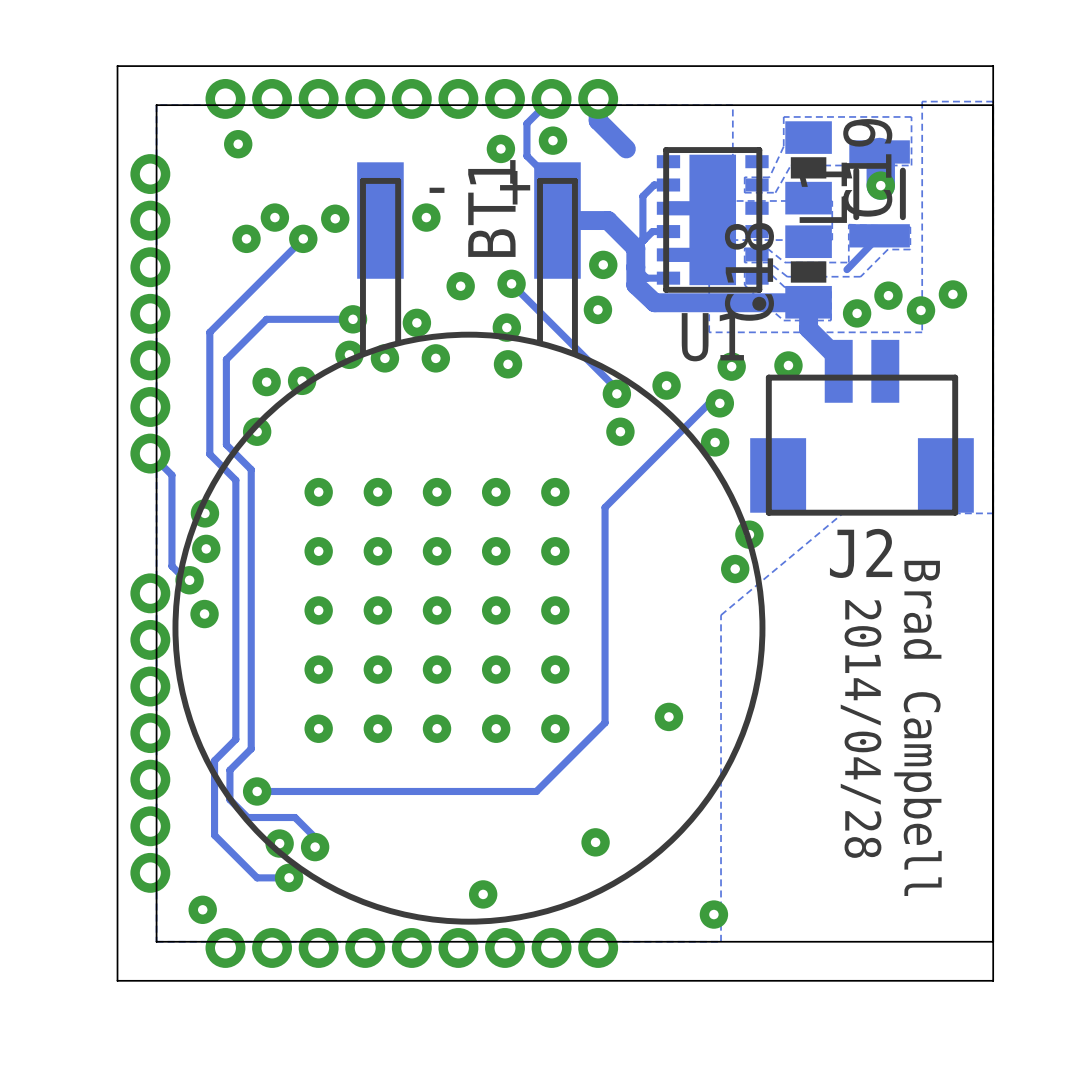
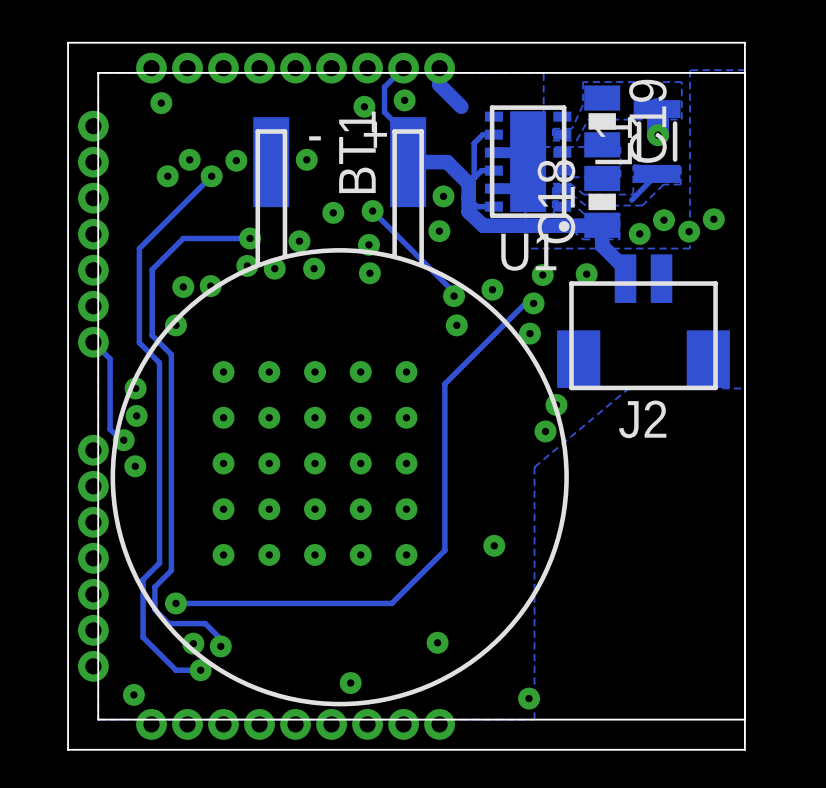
text: 2014/04/28 (861, 728) -> none
text: Brad Campbell (917, 728) -> none

